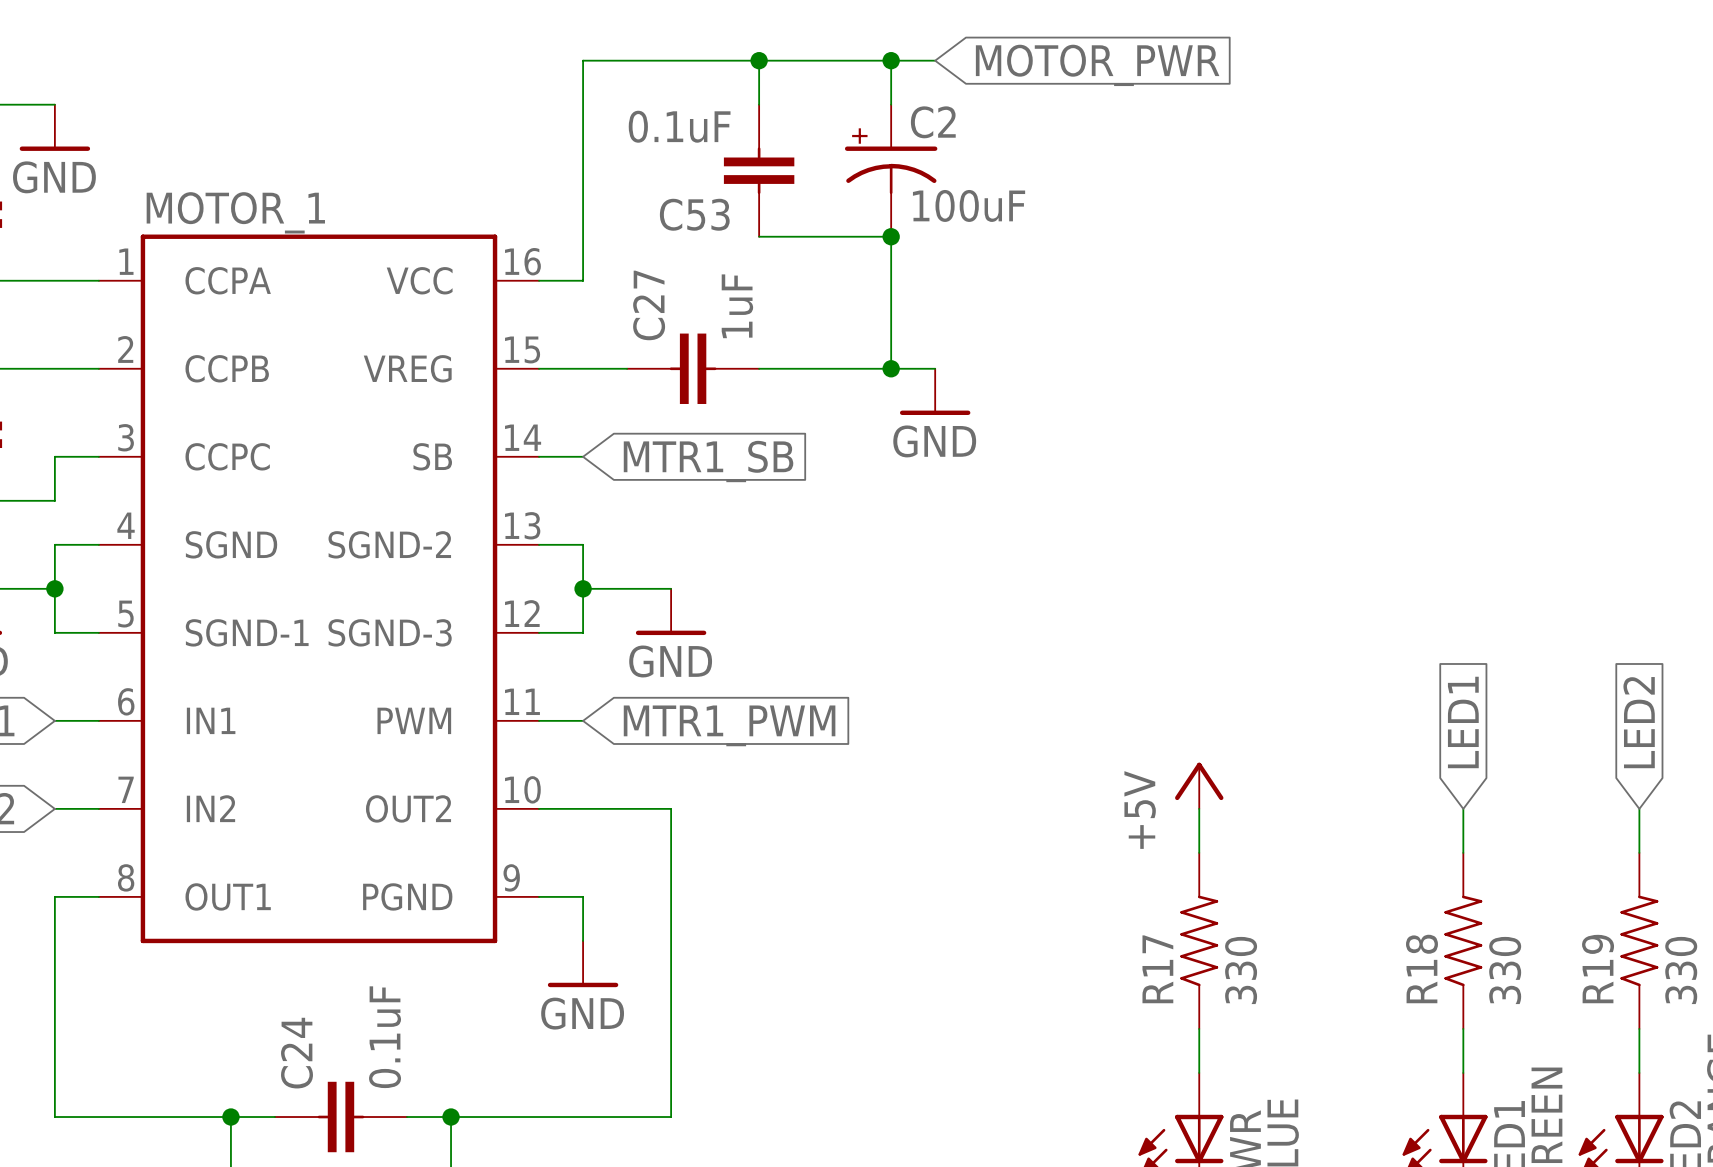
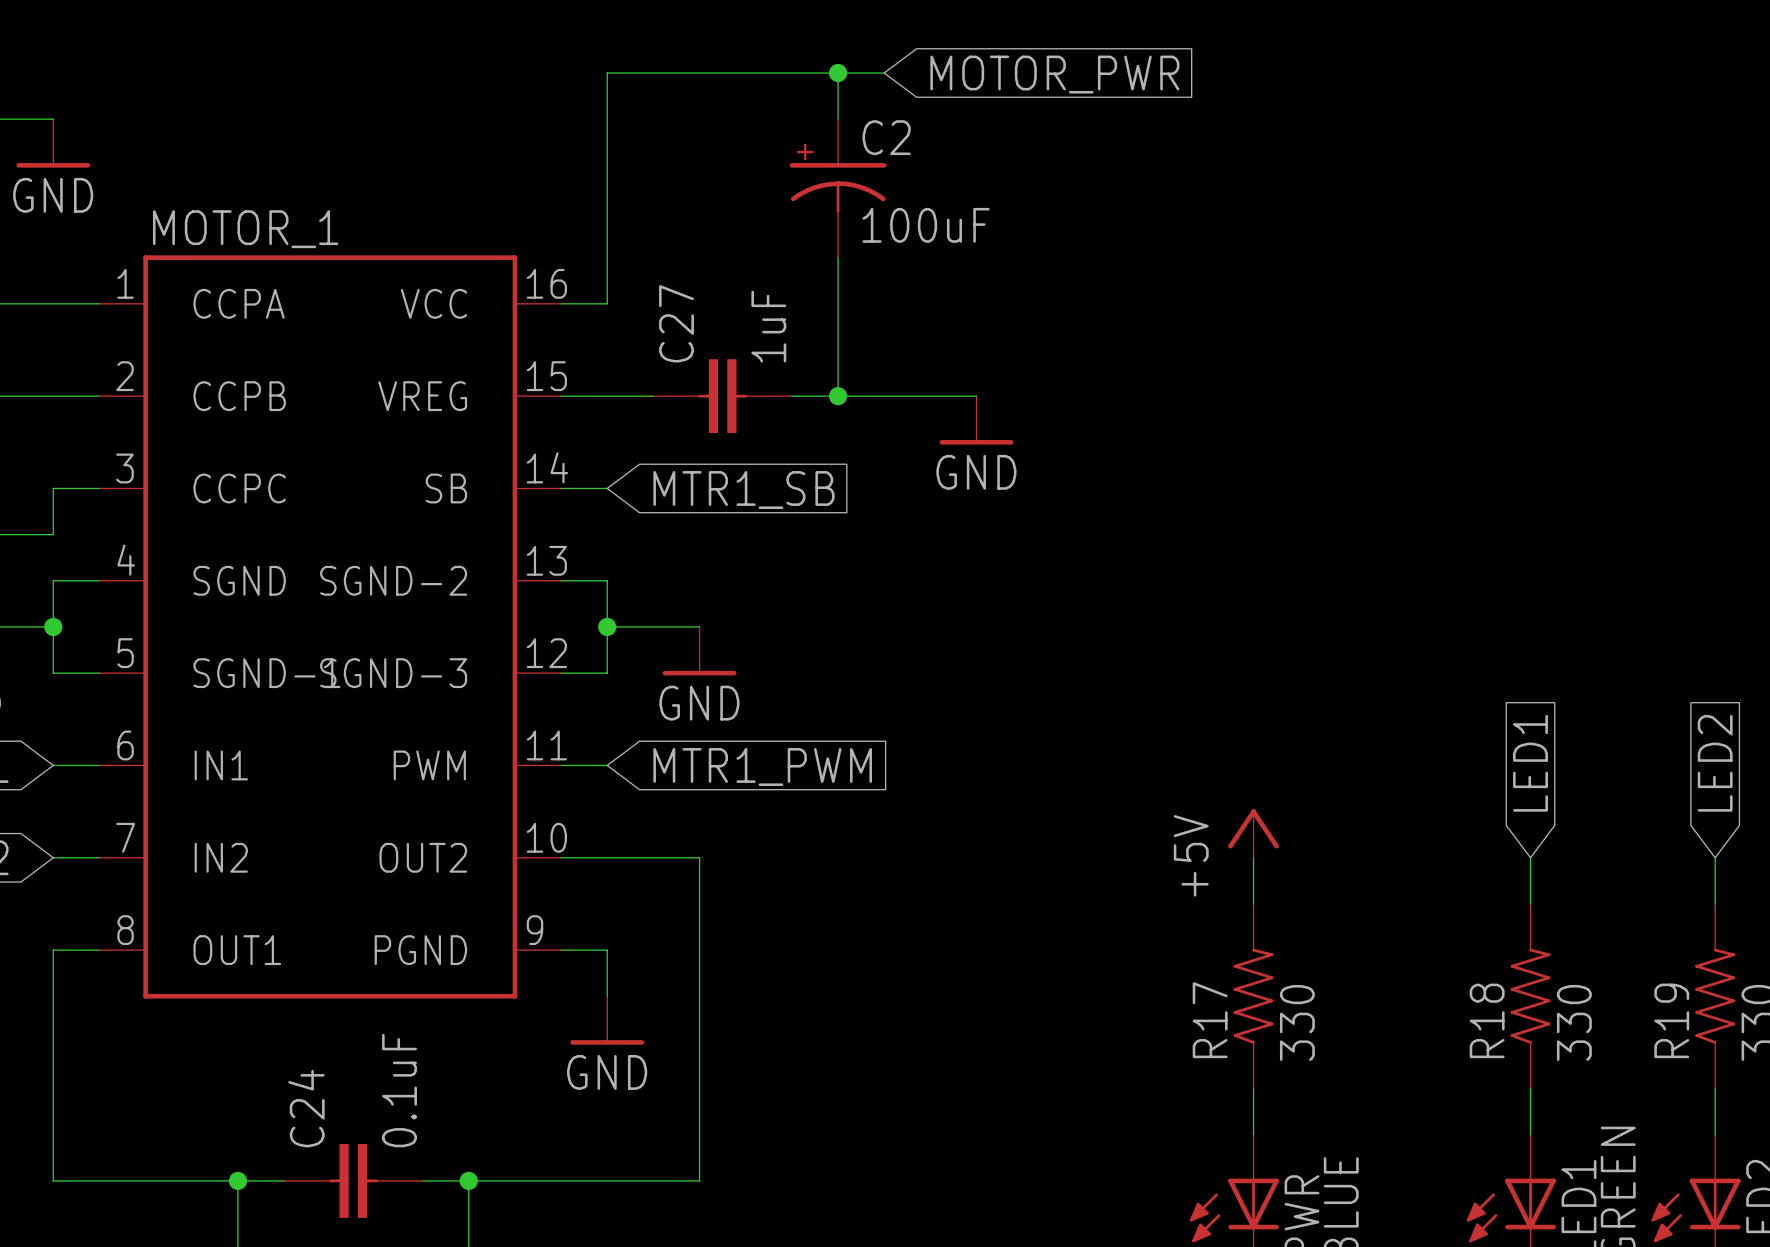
wire: (759, 60) (759, 104) -> (838, 73) (838, 119)
junction: (759, 60) -> none
junction: none -> (838, 73)
wire: (847, 60) (935, 60) -> none
wire: (891, 60) (891, 104) -> none
junction: (891, 60) -> none
global label position: MOTOR_PWR (1097, 65) -> MOTOR_PWR (1054, 74)
C53: 0.1uF (759, 170) -> none
C2 position: (891, 170) -> (838, 188)
wire: (759, 236) (891, 236) (891, 368) -> none
wire: none -> (838, 257) (838, 396)
junction: (891, 236) -> none
junction: none -> (838, 396)
junction: (891, 368) -> none

